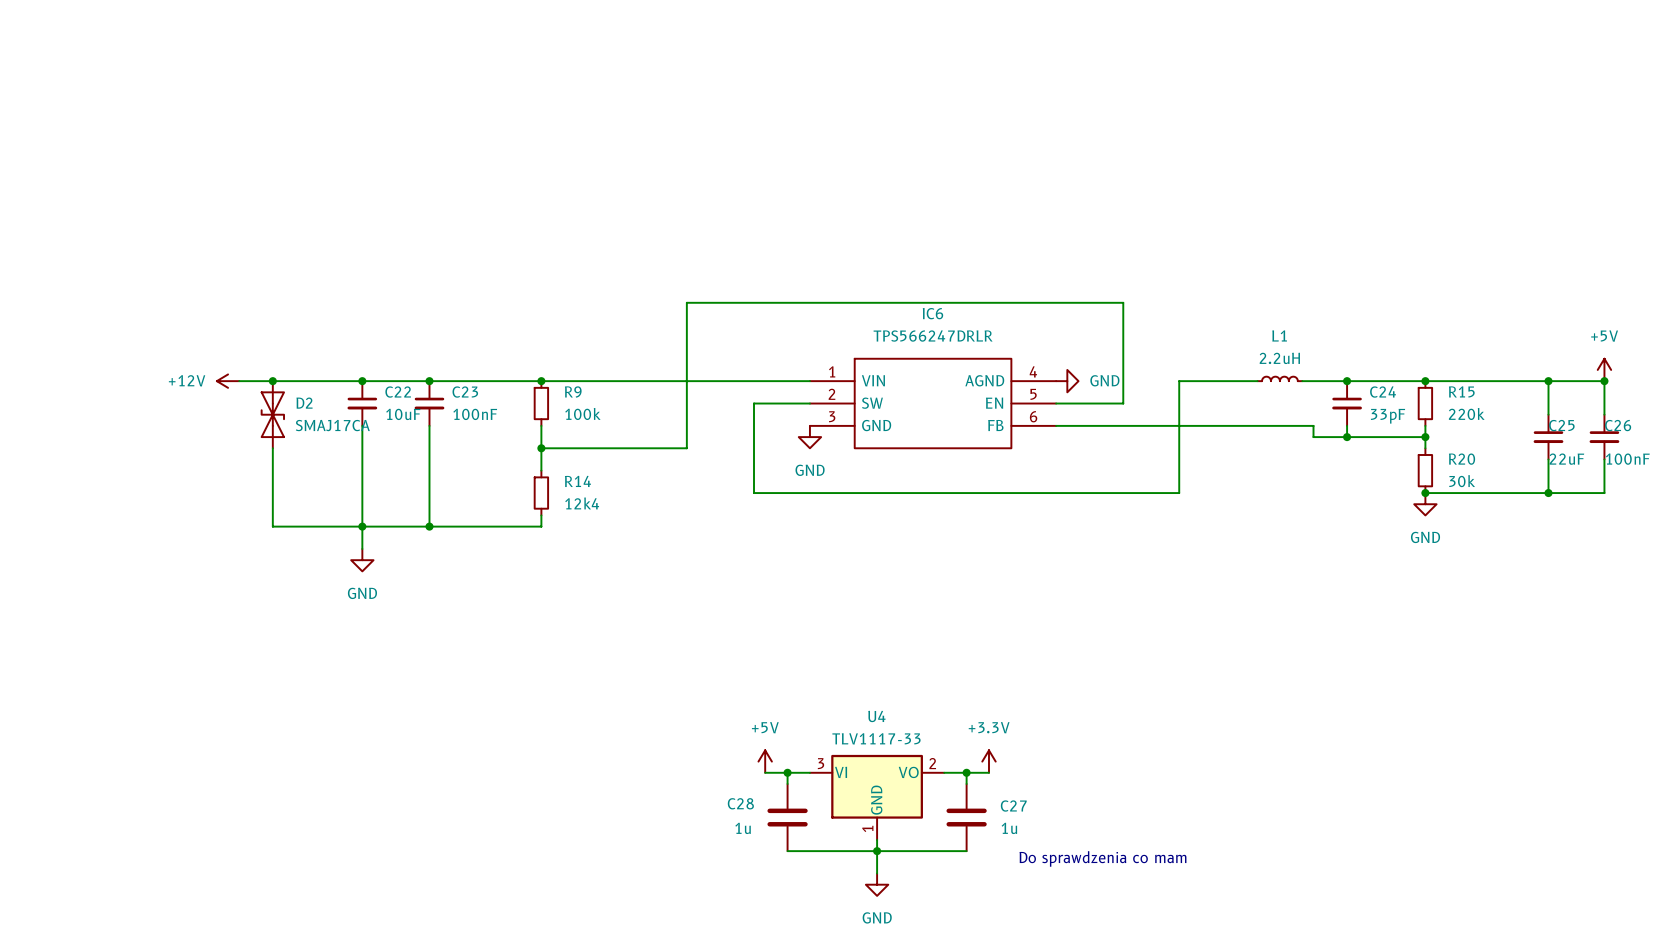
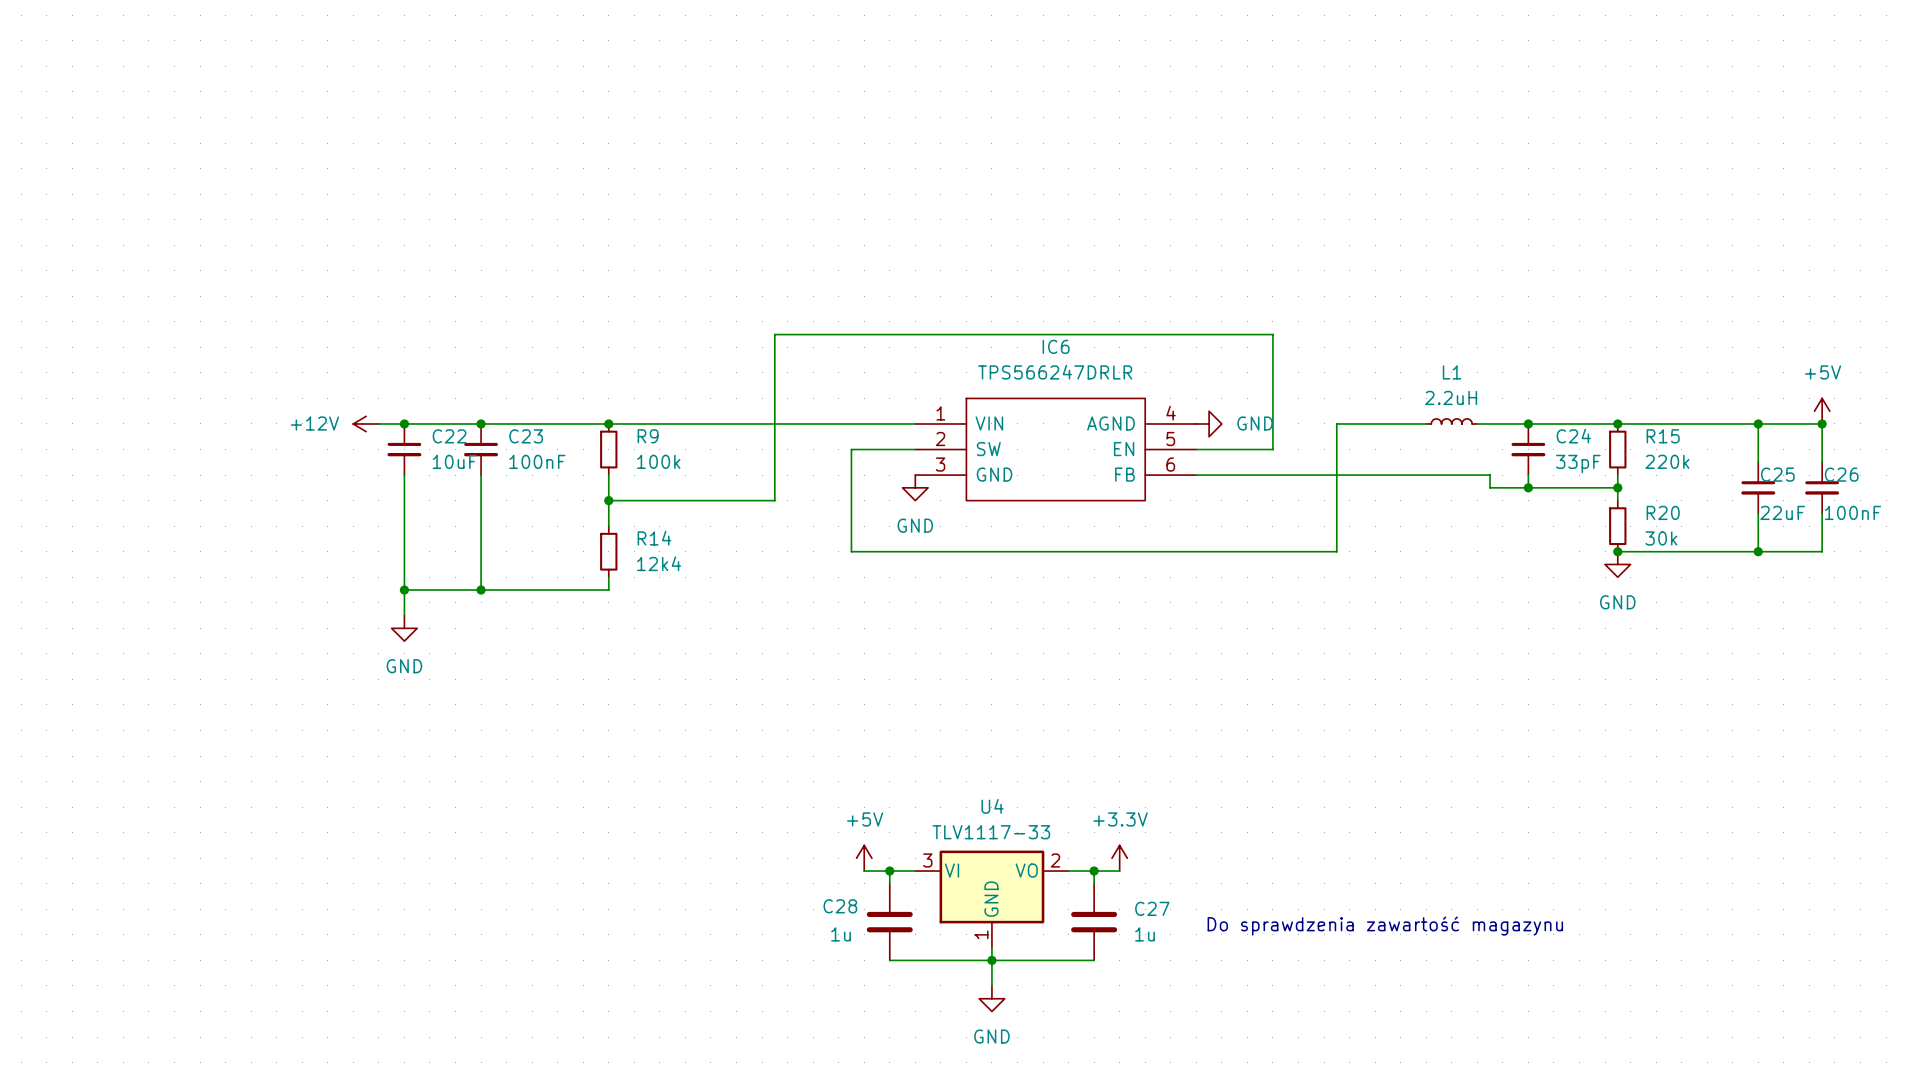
power symbol position: +12V (228, 381) -> +12V (366, 423)
wire: (239, 381) (339, 381) -> none
junction: (272, 381) -> none
D2: SMAJ17CA (272, 414) -> none
wire: (272, 448) (272, 526) (362, 526) -> none
text: none -> Do sprawdzenia zawartość magazynu (1385, 926)
text: Do sprawdzenia co mam (1102, 858) -> none

